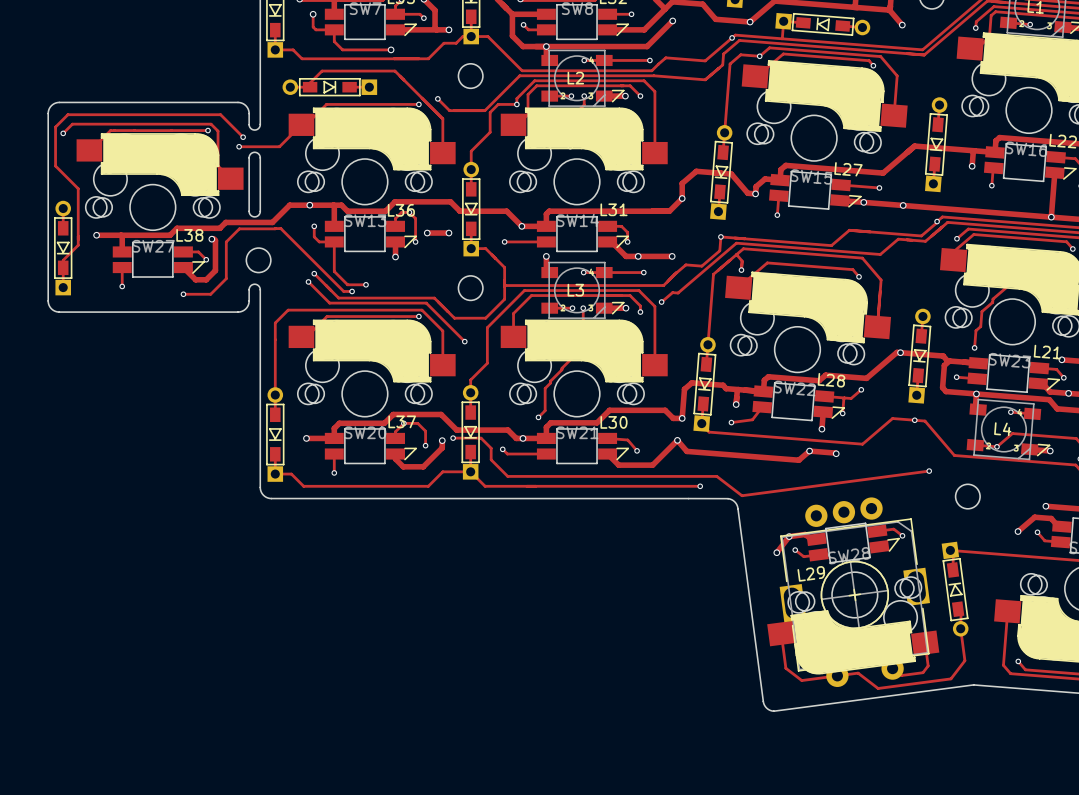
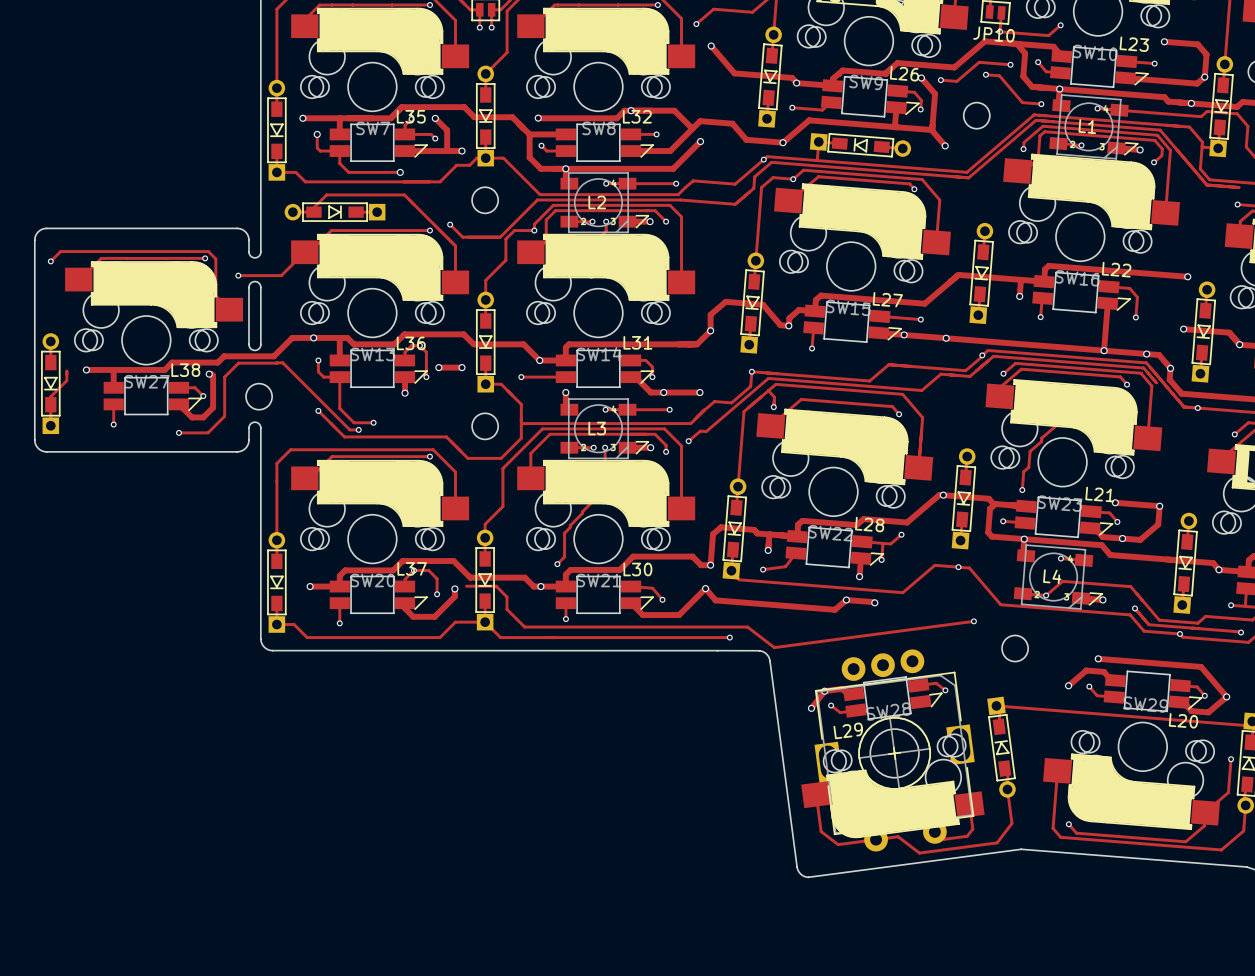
track: (243, 137) (220, 114) (67, 114) (55, 127) (55, 166) (78, 188) (78, 236) -> none
via: (243, 137) -> none
track: (308, 281) (329, 303) (426, 303) (464, 341) -> none
via: (308, 281) -> none
via: (464, 341) -> none
via: (453, 438) -> none
track: (502, 449) (507, 454) (546, 454) -> (565, 619) (565, 603)
via position: (502, 449) -> (565, 619)

